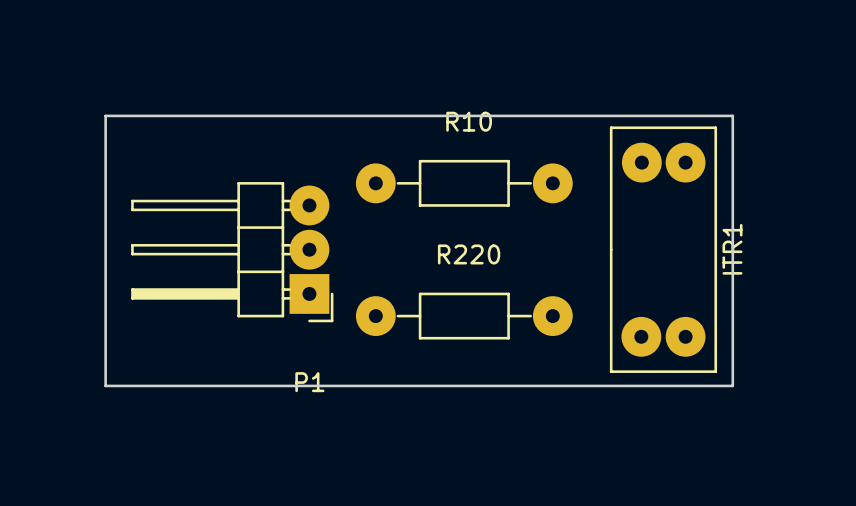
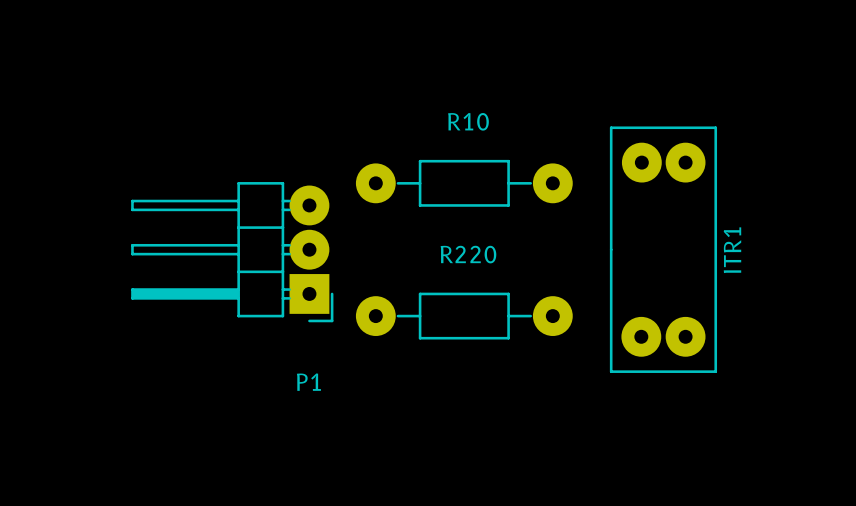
board edge: (105, 115) (105, 385) (732, 385) (732, 115) (105, 115) -> none

